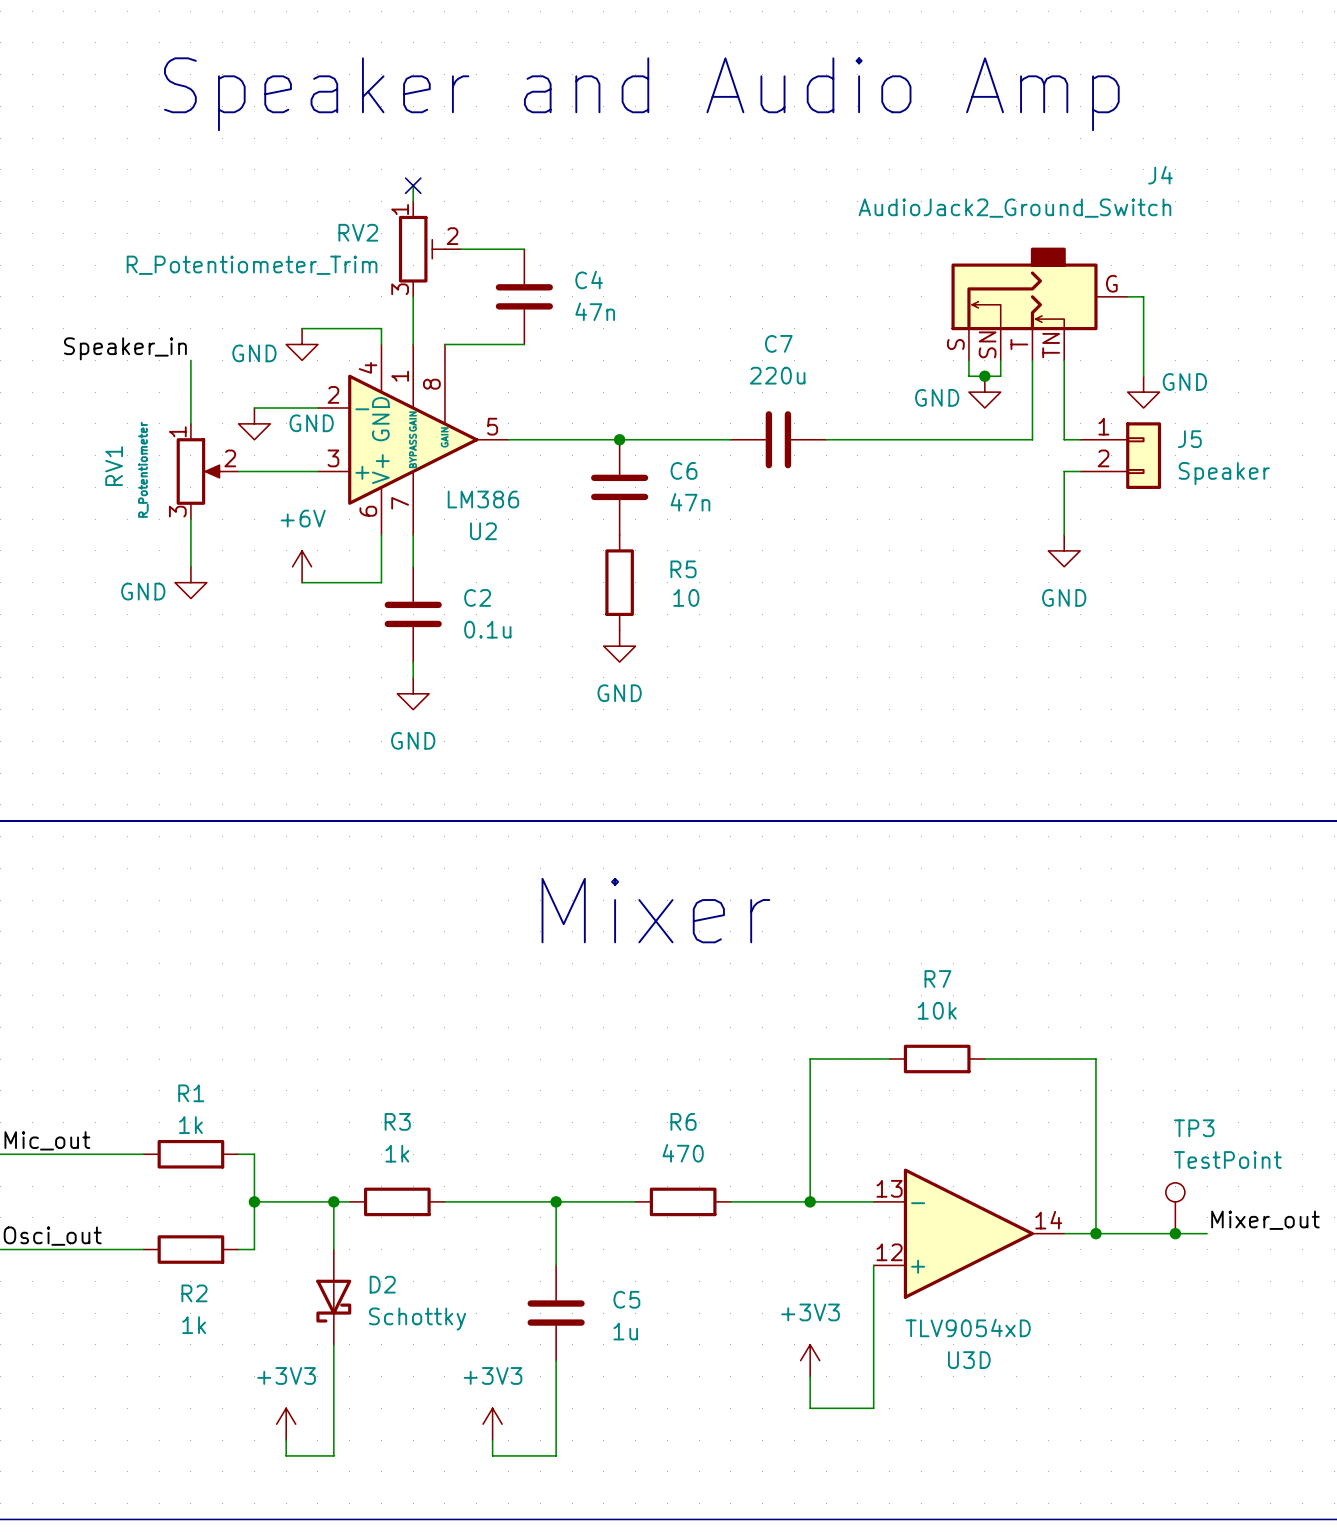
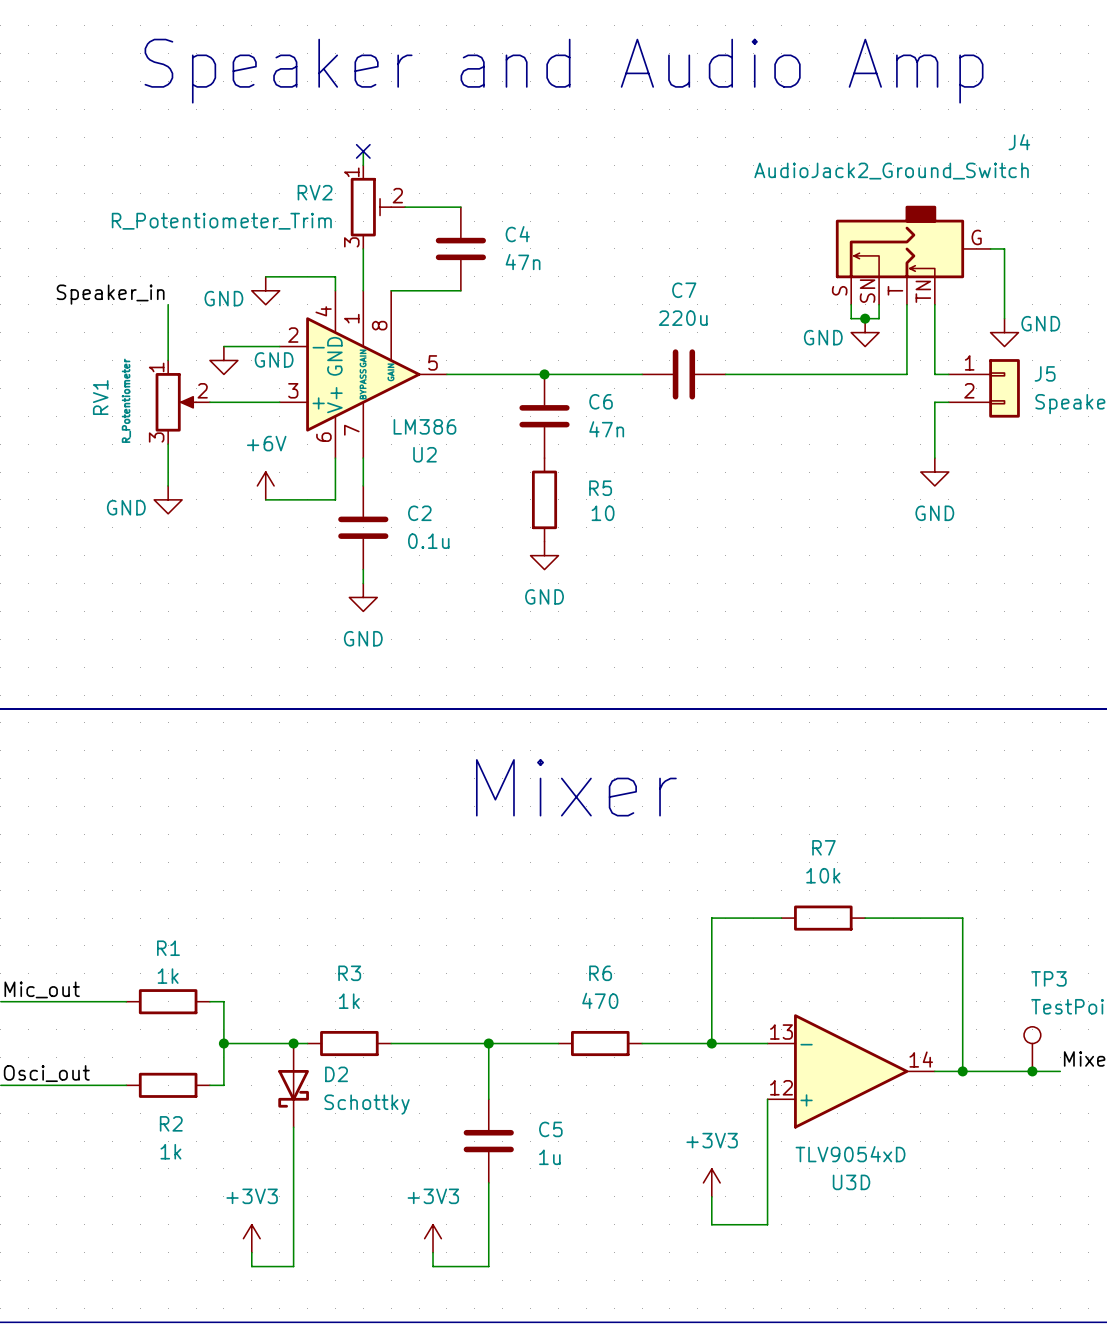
D2 position: (333, 1297) -> (293, 1085)

